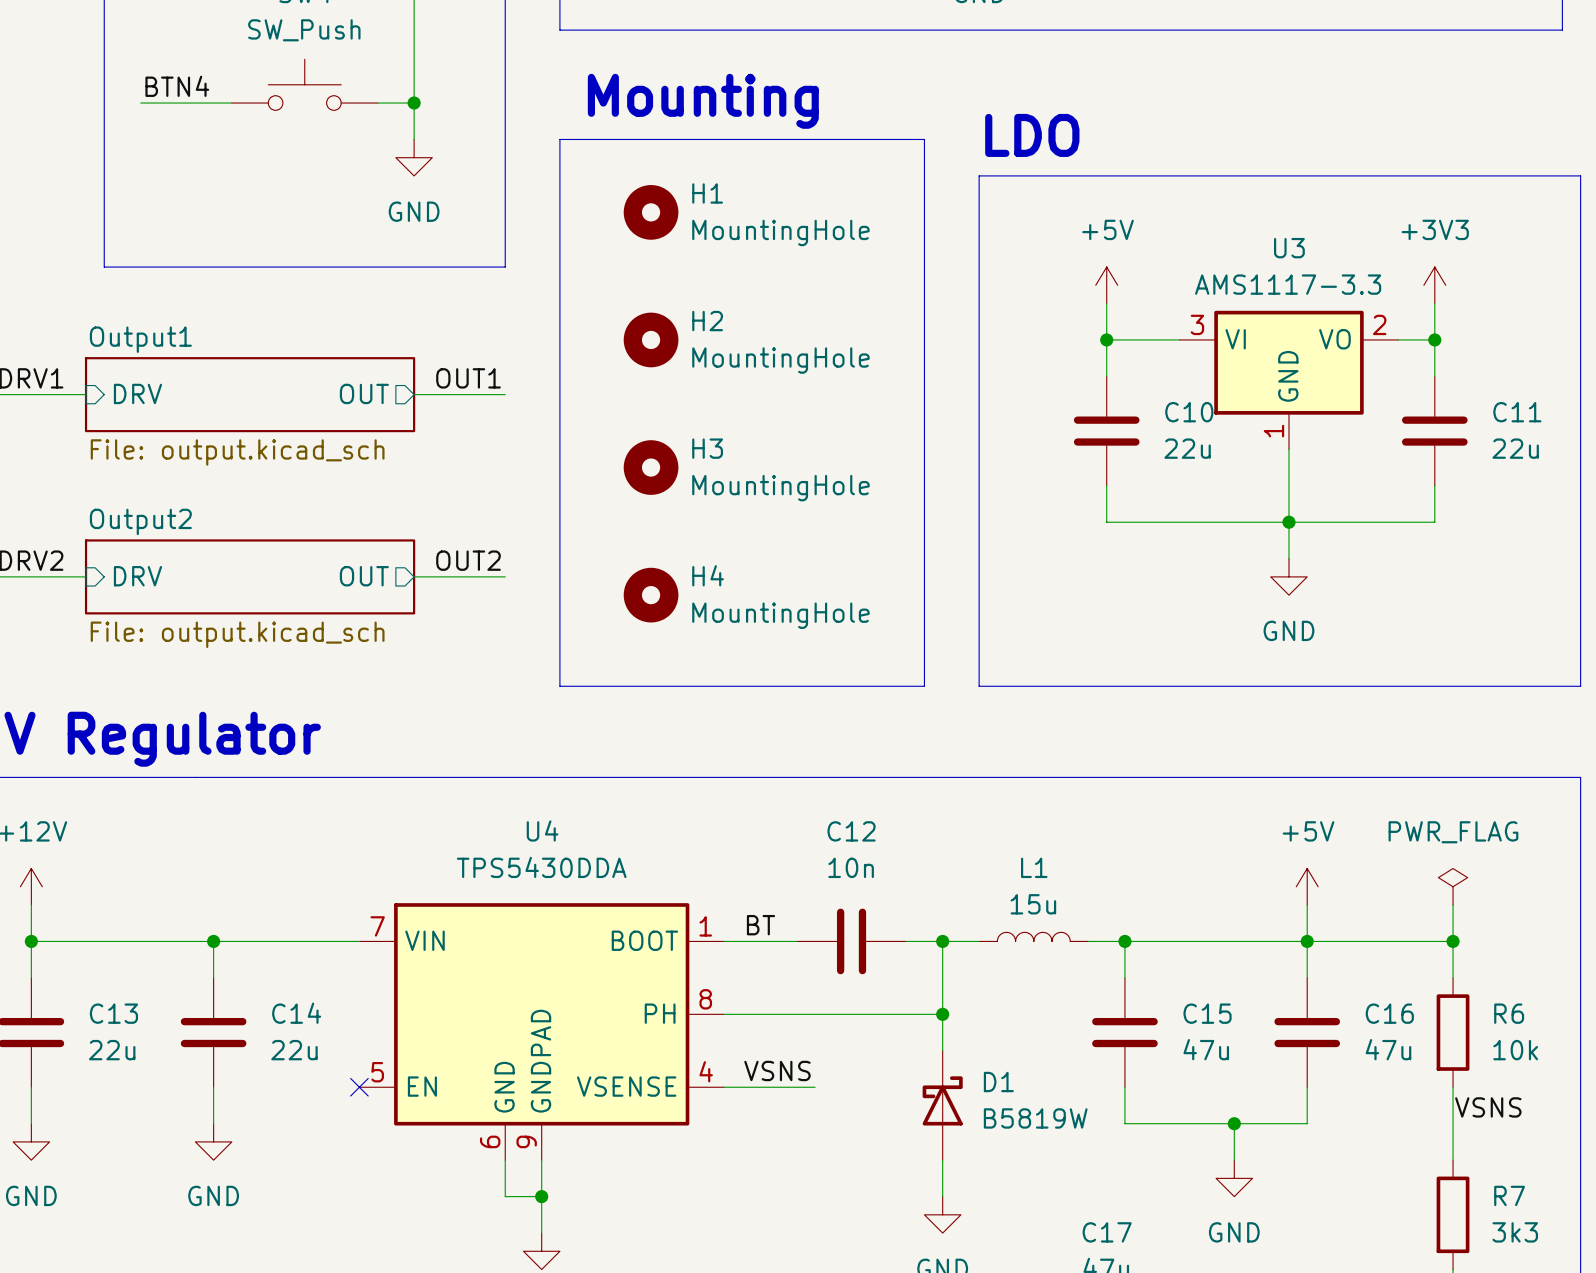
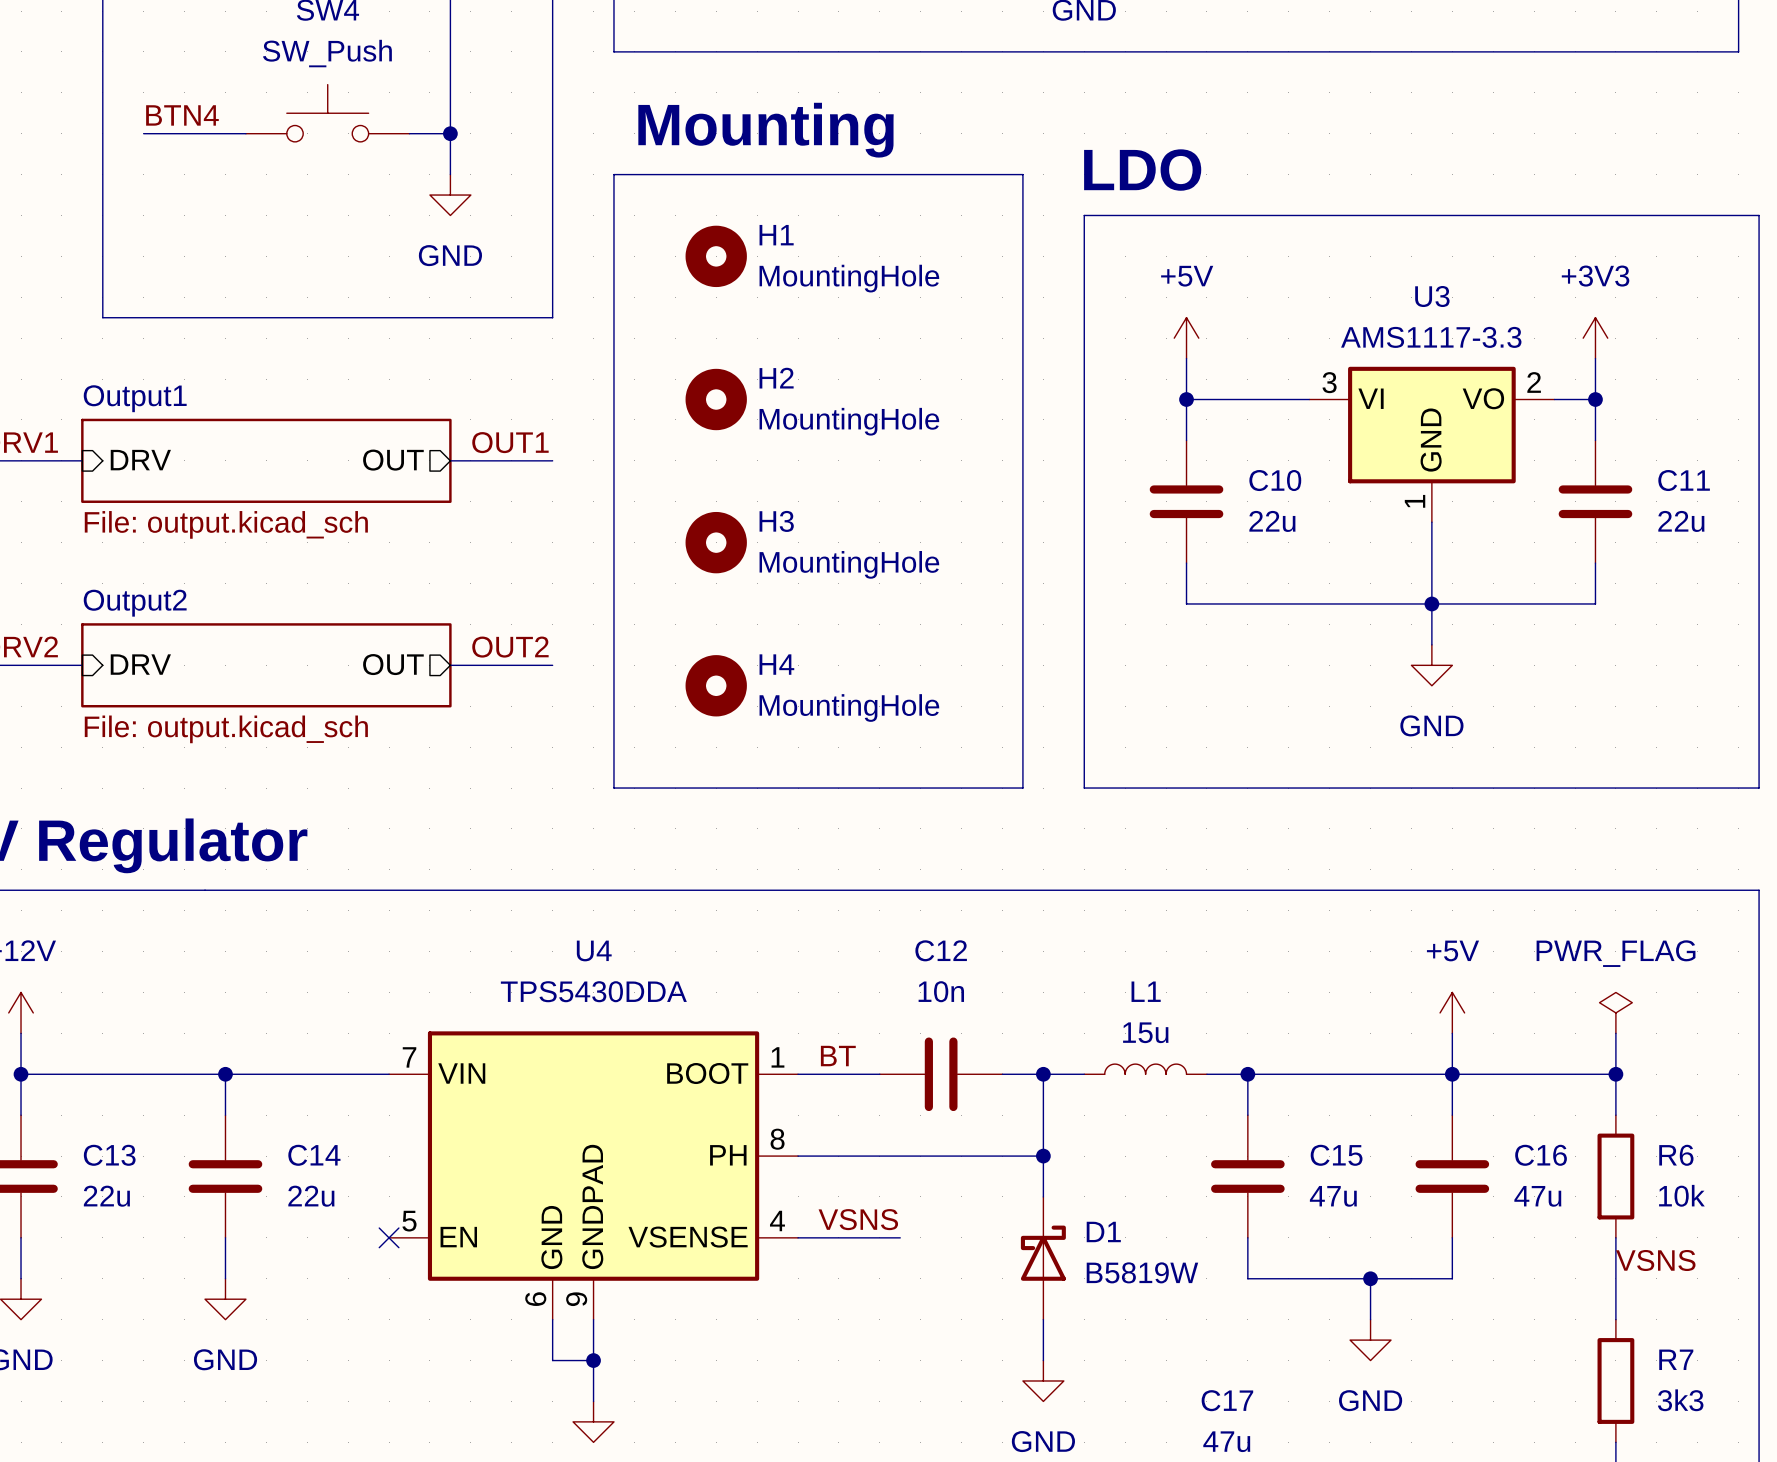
power symbol position: +5V (1106, 285) -> +5V (1186, 338)
wire: (1106, 303) (1106, 376) -> (1186, 358) (1186, 440)
wire: none -> (1186, 399) (1227, 399)
junction position: (1106, 339) -> (1186, 399)
C10 position: (1106, 431) -> (1186, 501)
wire: (1106, 485) (1106, 522) -> (1186, 563) (1186, 603) (1227, 603)

